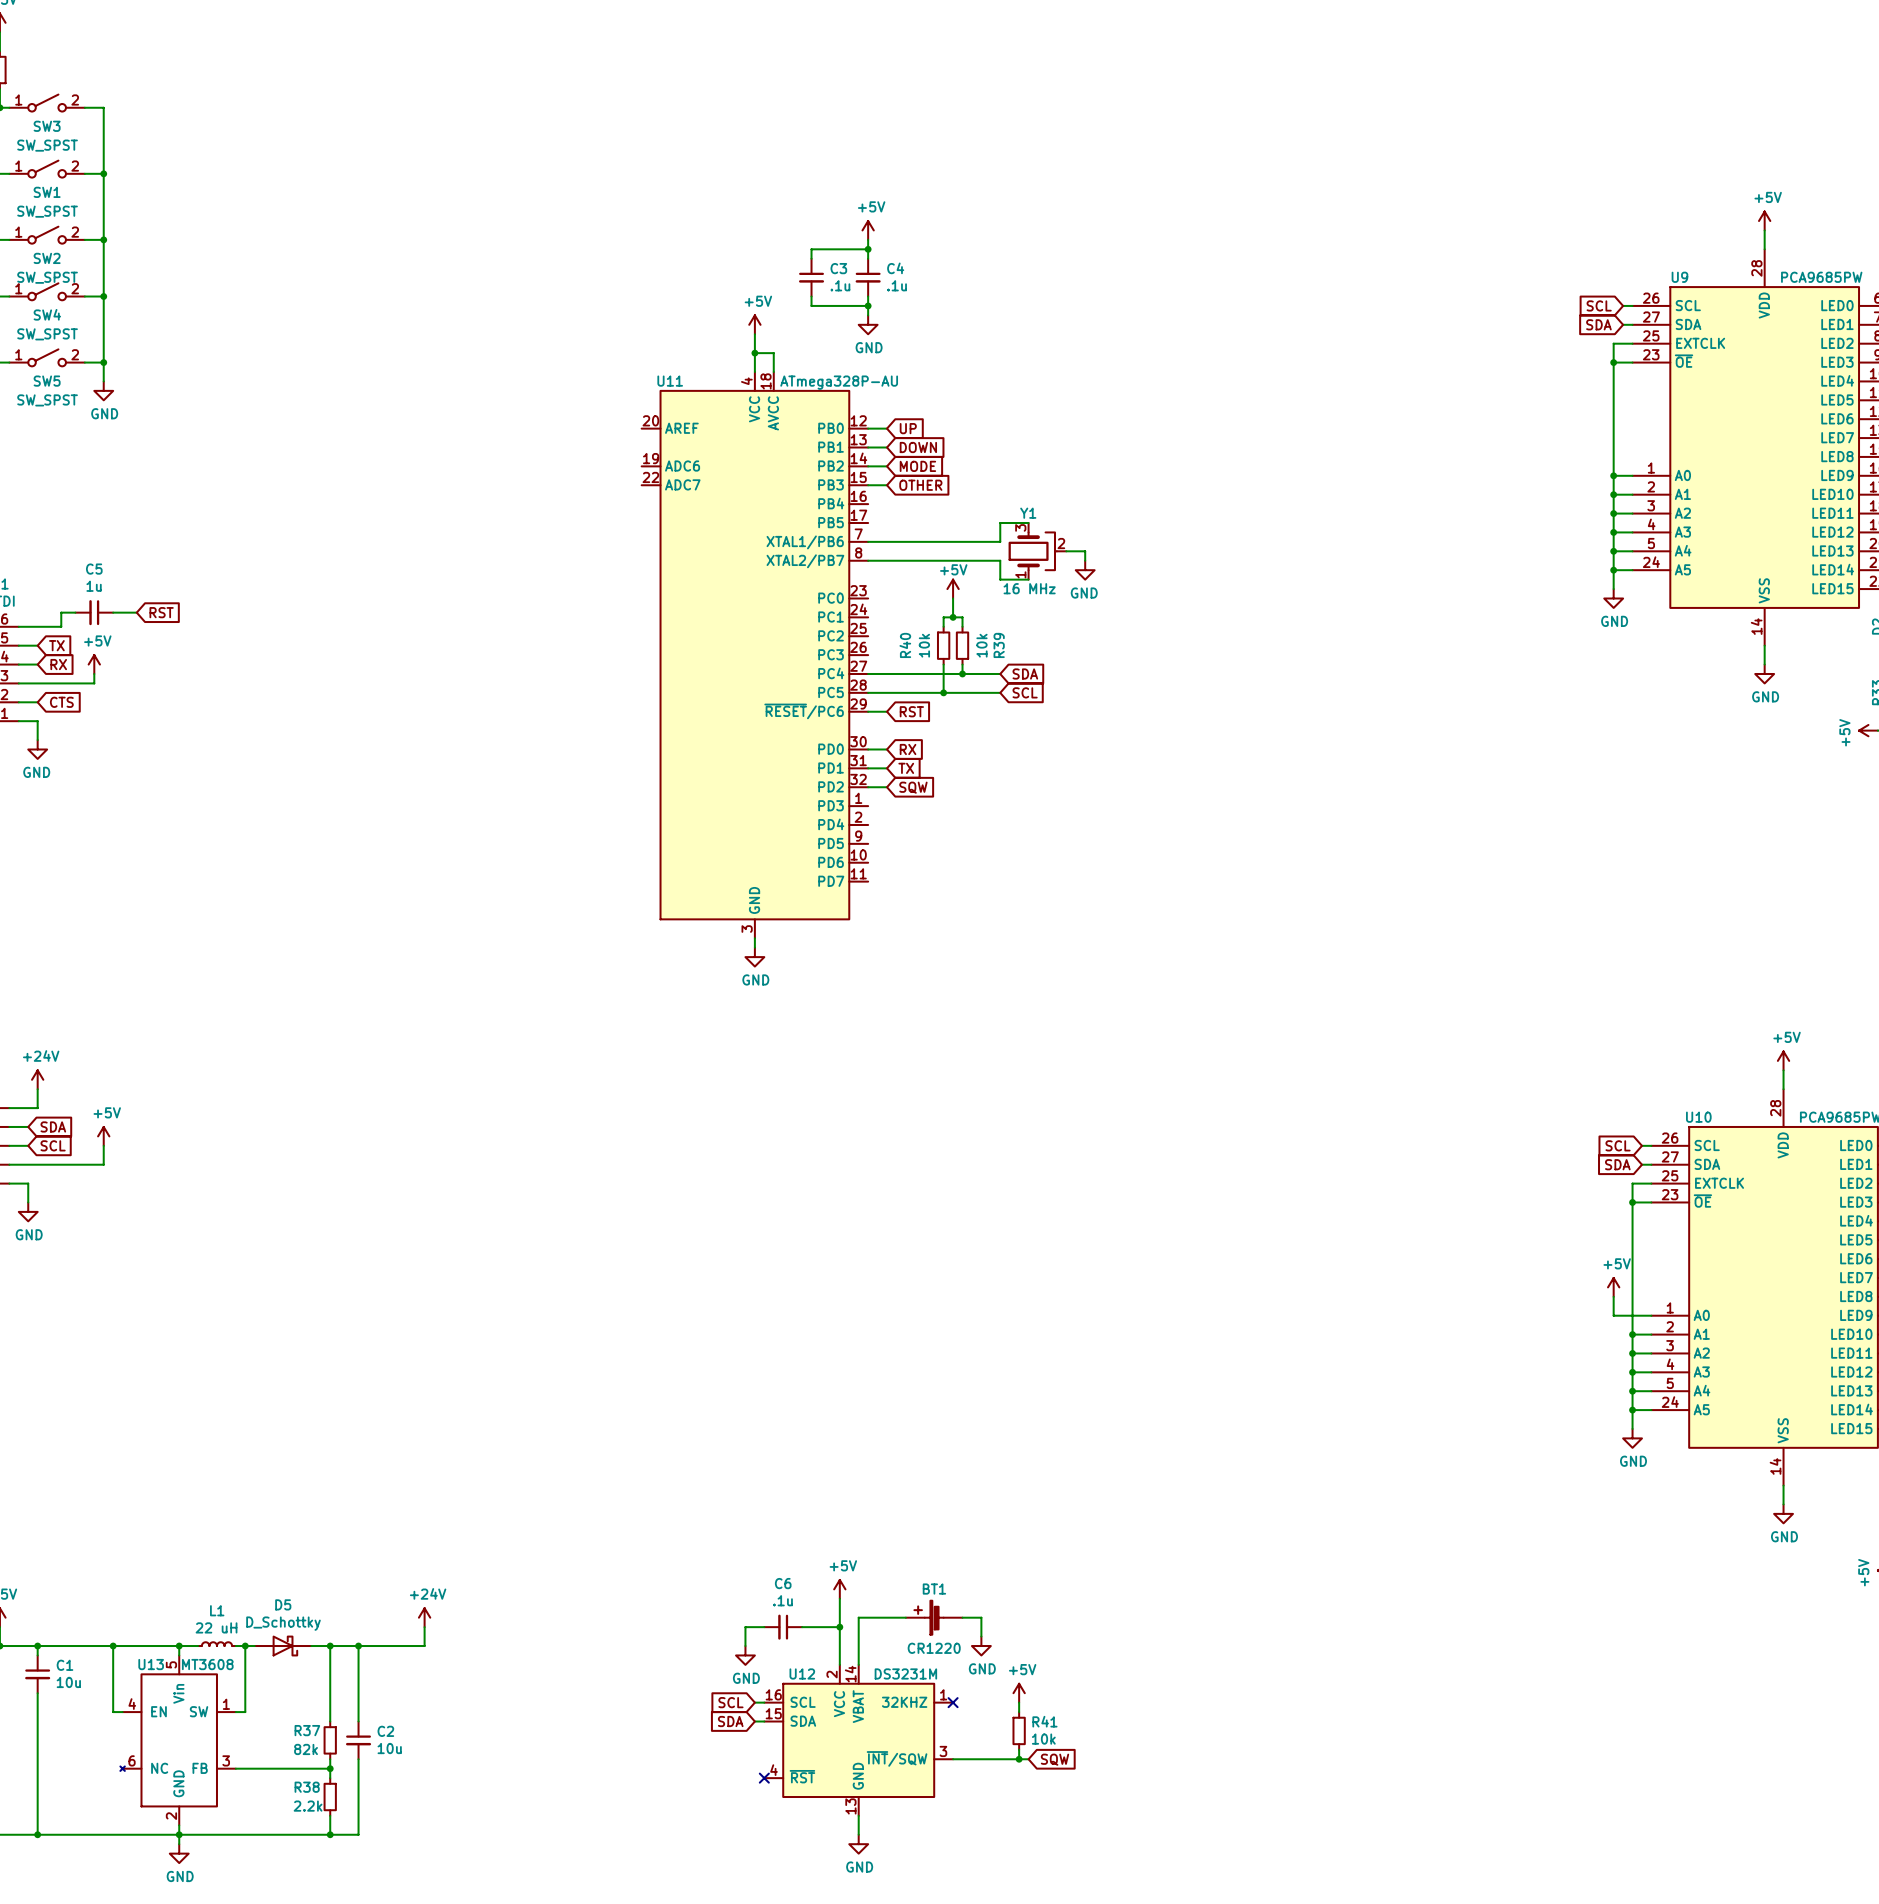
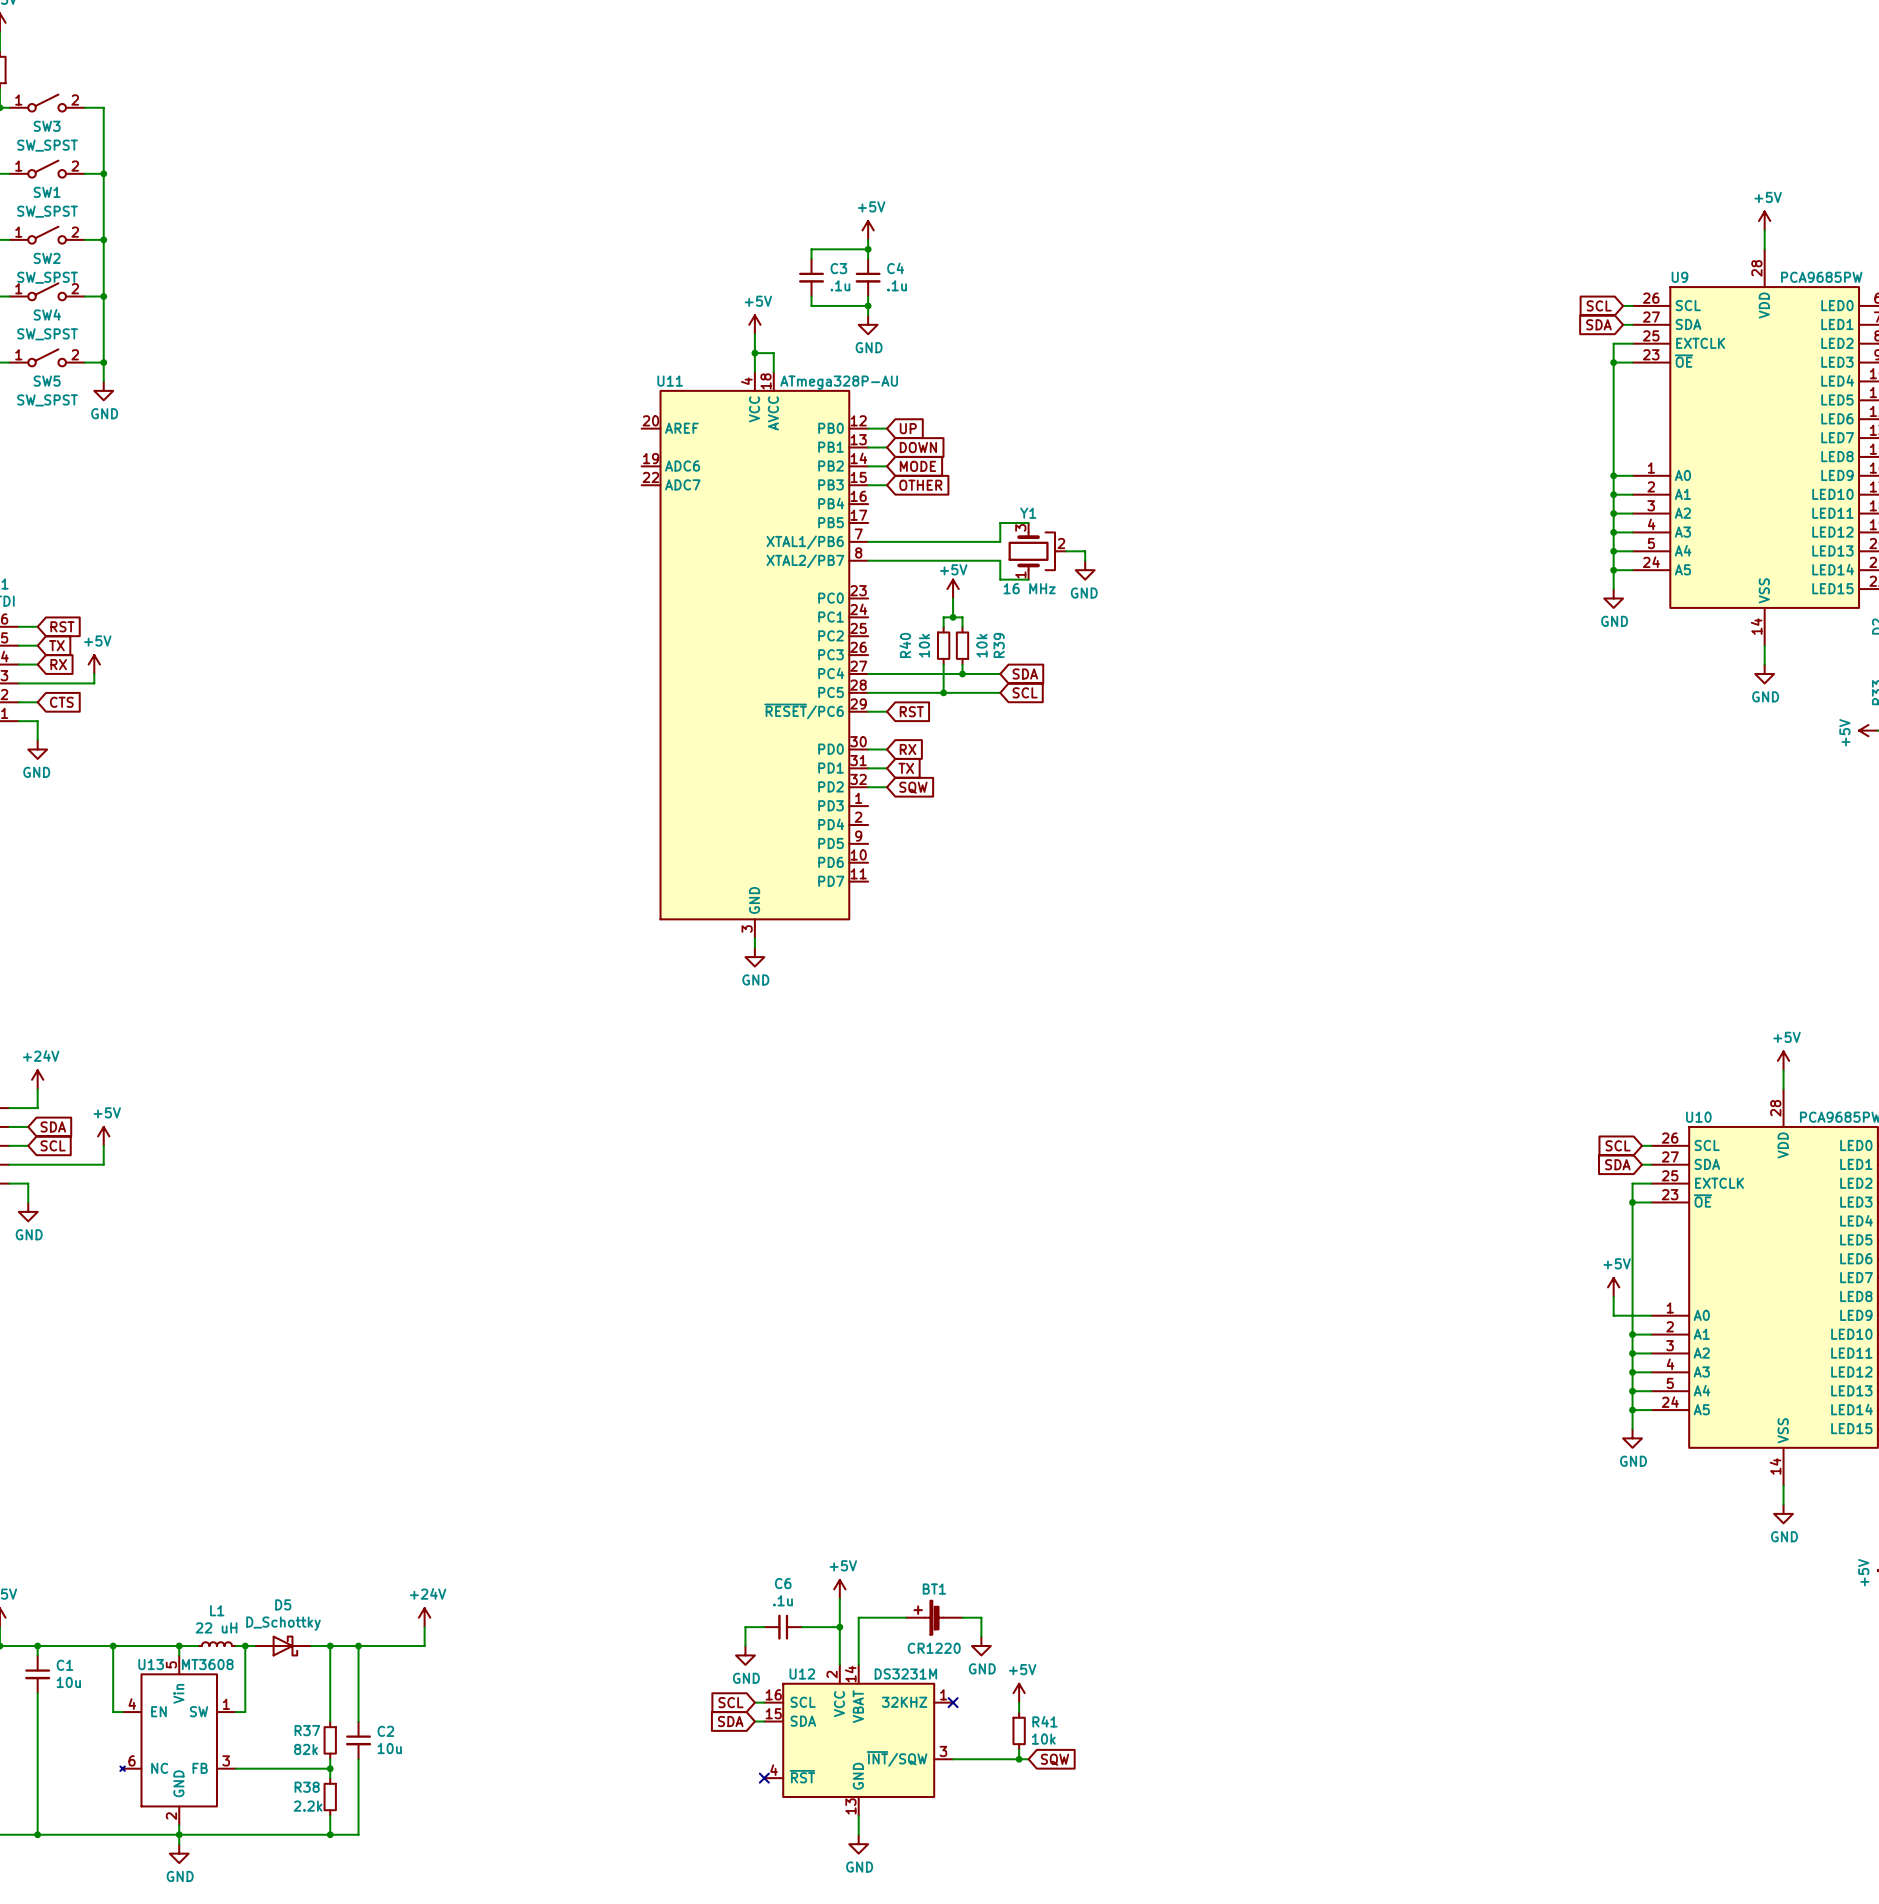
wire: (75, 612) (61, 612) (61, 626) (37, 626) -> none
C5: 1u (94, 612) -> none
wire: (113, 612) (136, 612) -> none
global label position: RST (161, 612) -> RST (62, 626)

